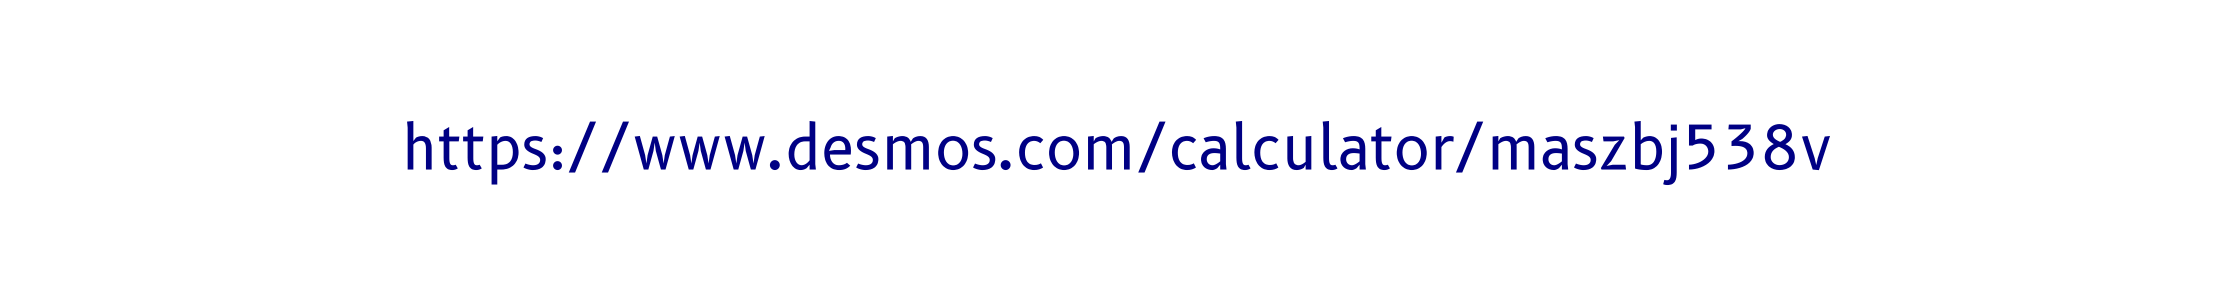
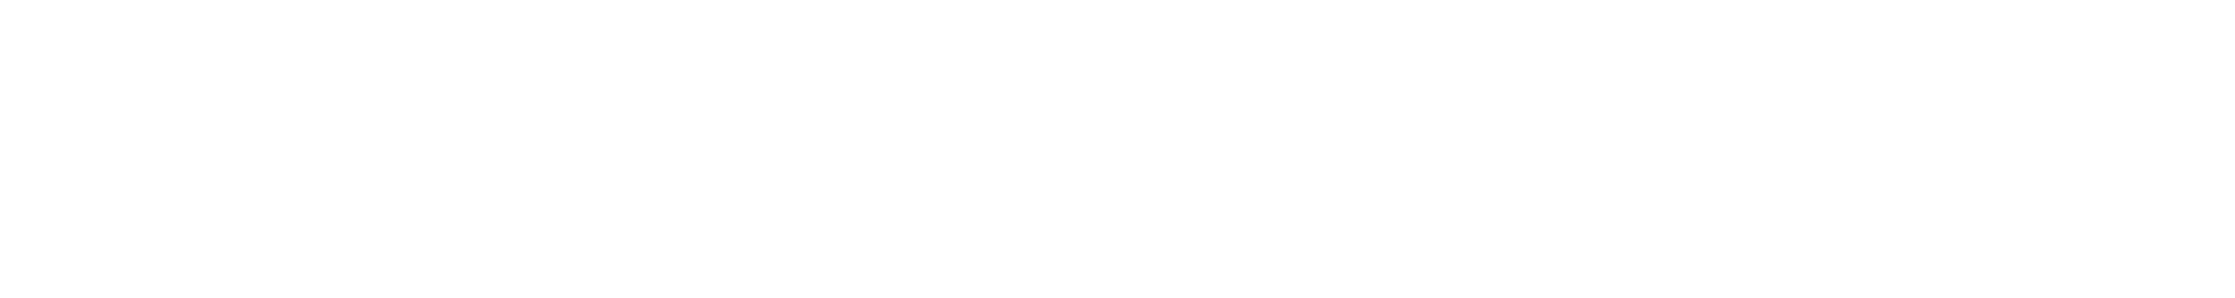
text: https://www.desmos.com/calculator/maszbj538v (1118, 153) -> none

